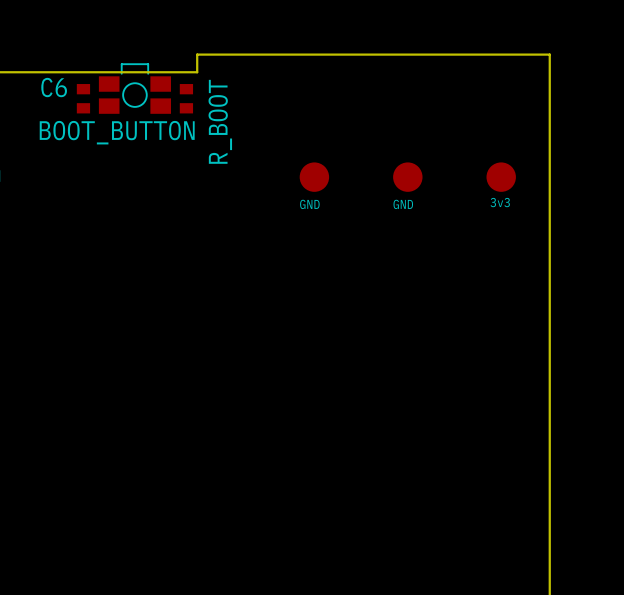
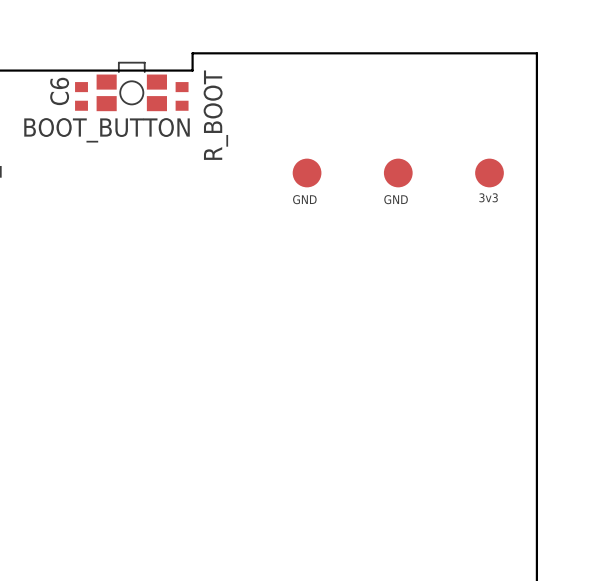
C6 name rotation: 0° (54, 87) -> 90° counterclockwise (59, 91)

